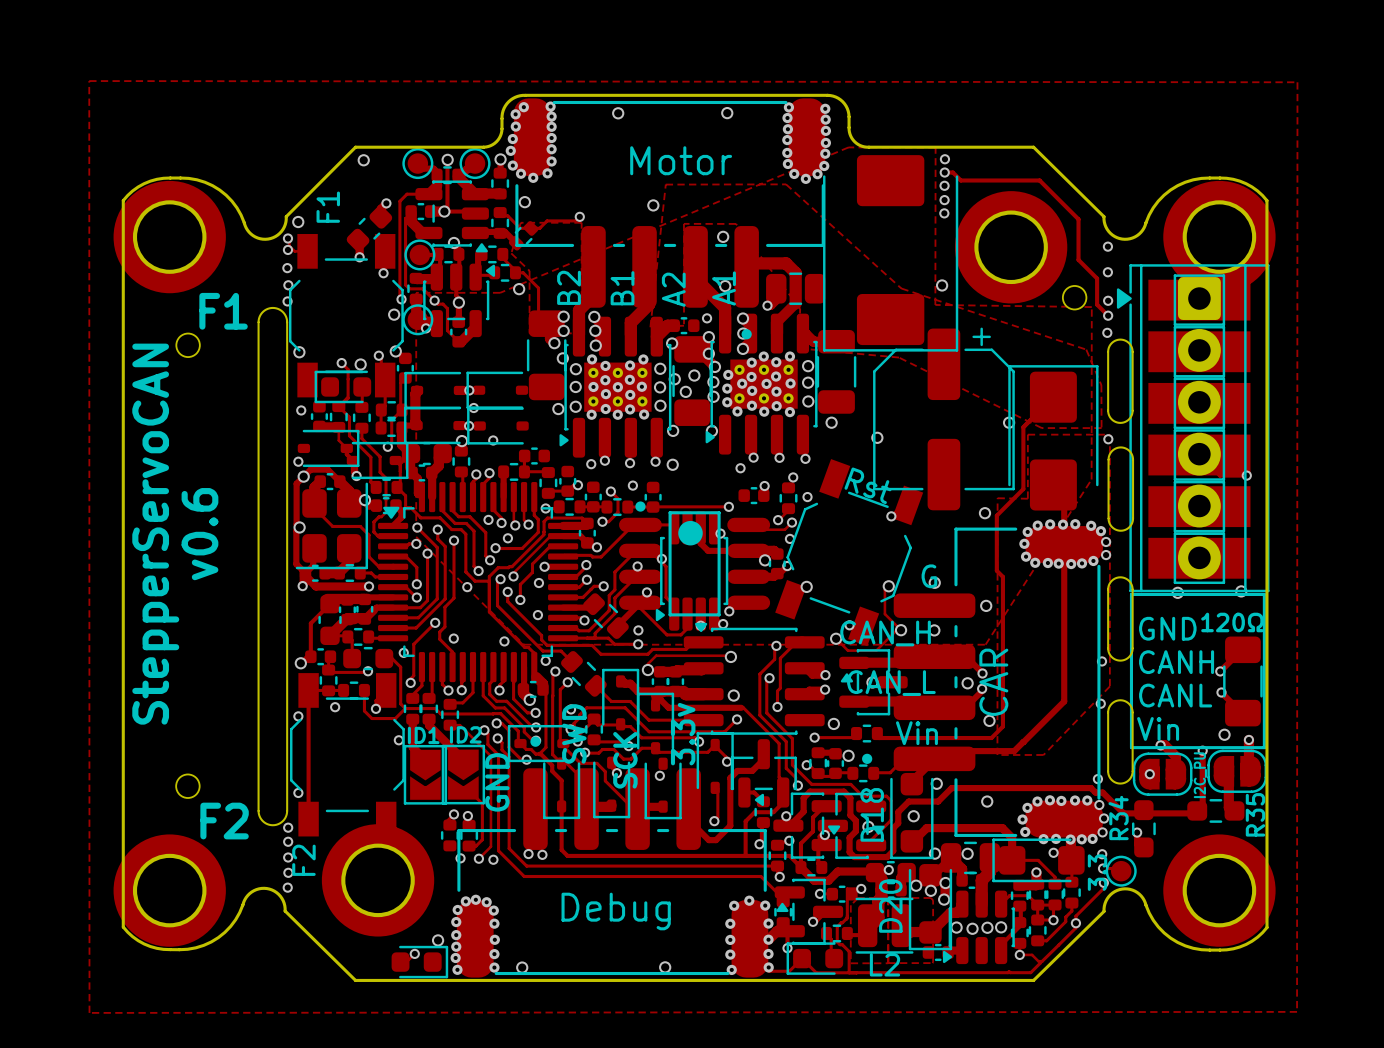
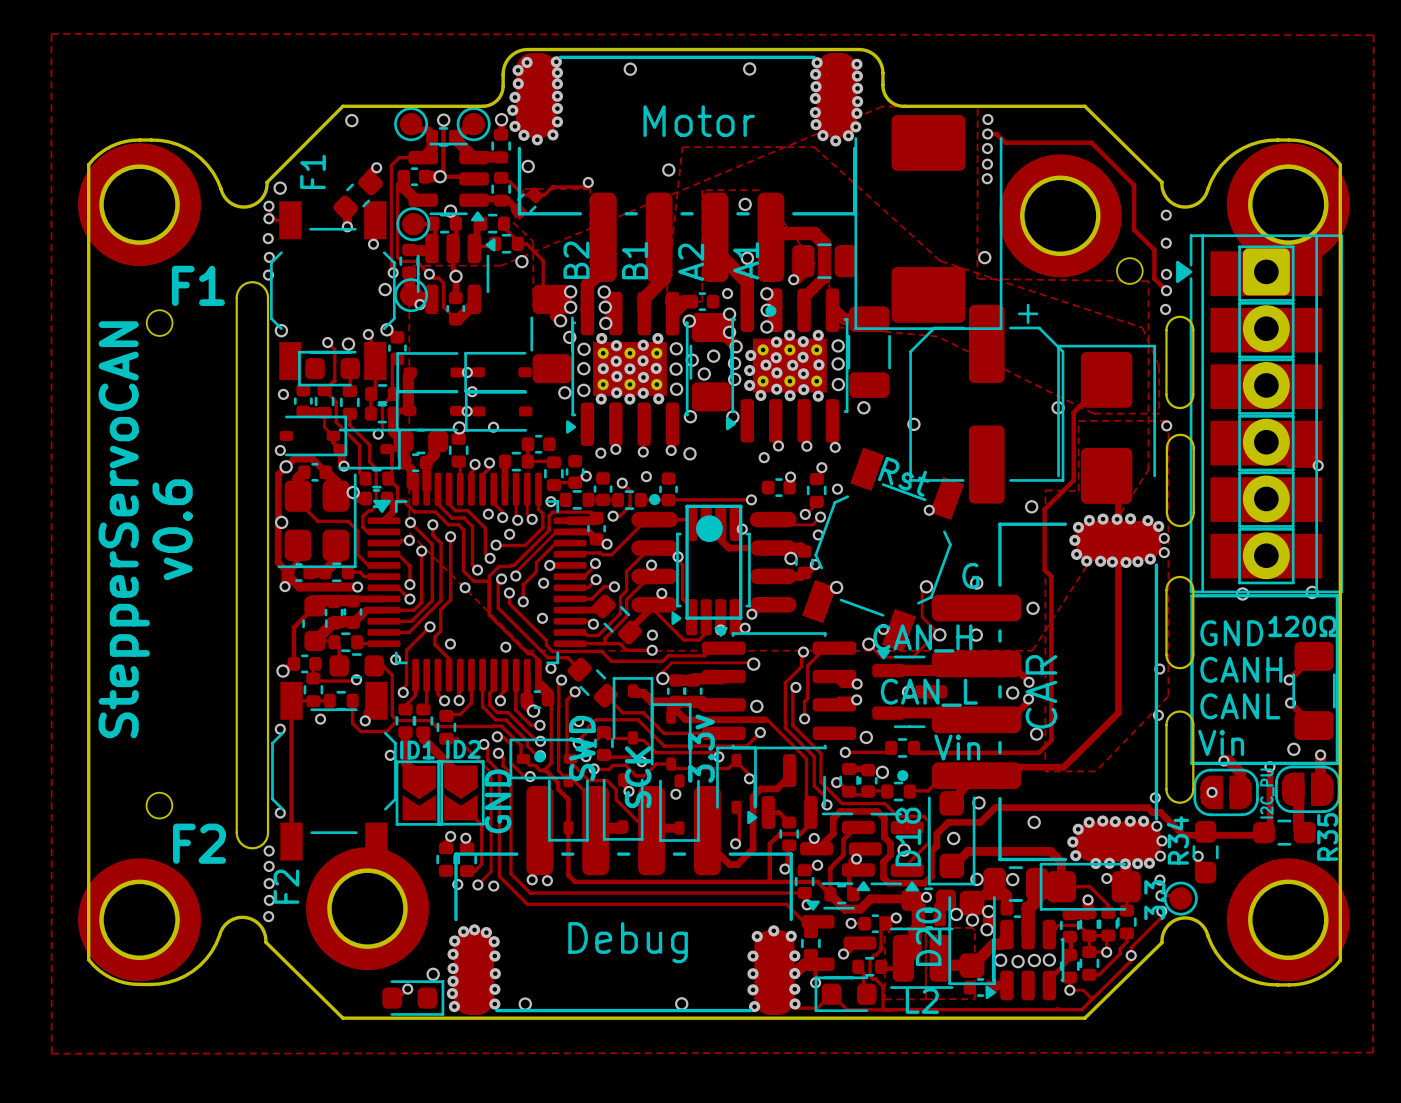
part footprint: [415, 180, 489, 253] -> [408, 142, 489, 222]
part footprint: [423, 263, 496, 338] -> [416, 233, 496, 315]
part footprint: [839, 649, 908, 716] -> [872, 649, 948, 729]
part footprint: [730, 739, 797, 808] -> [747, 754, 826, 829]
part footprint: [773, 792, 842, 859] -> [800, 812, 875, 892]
part footprint: [817, 792, 887, 859] -> [848, 812, 924, 892]
part footprint: [774, 878, 844, 945] -> [801, 900, 877, 980]

